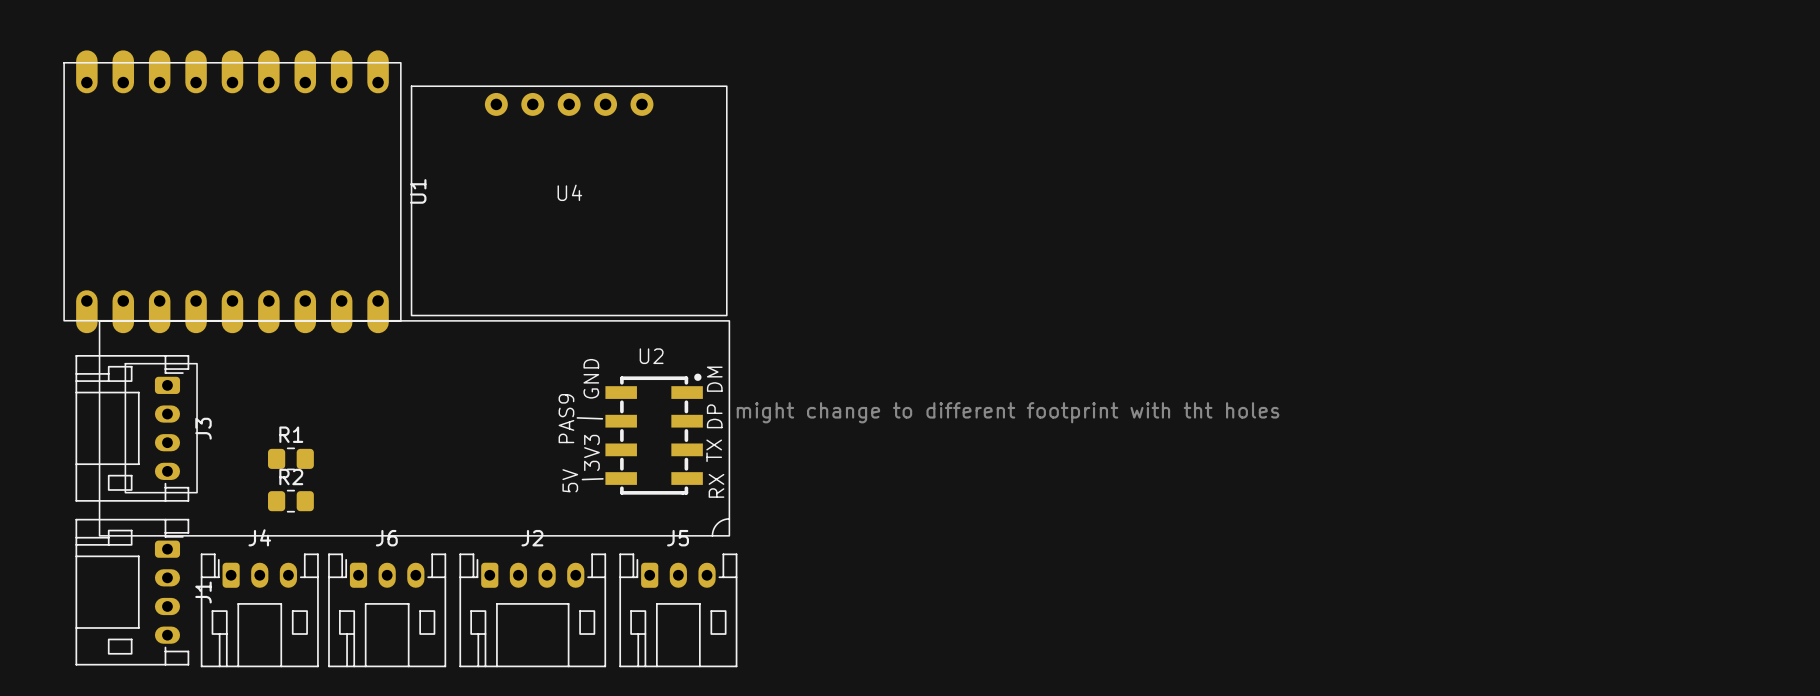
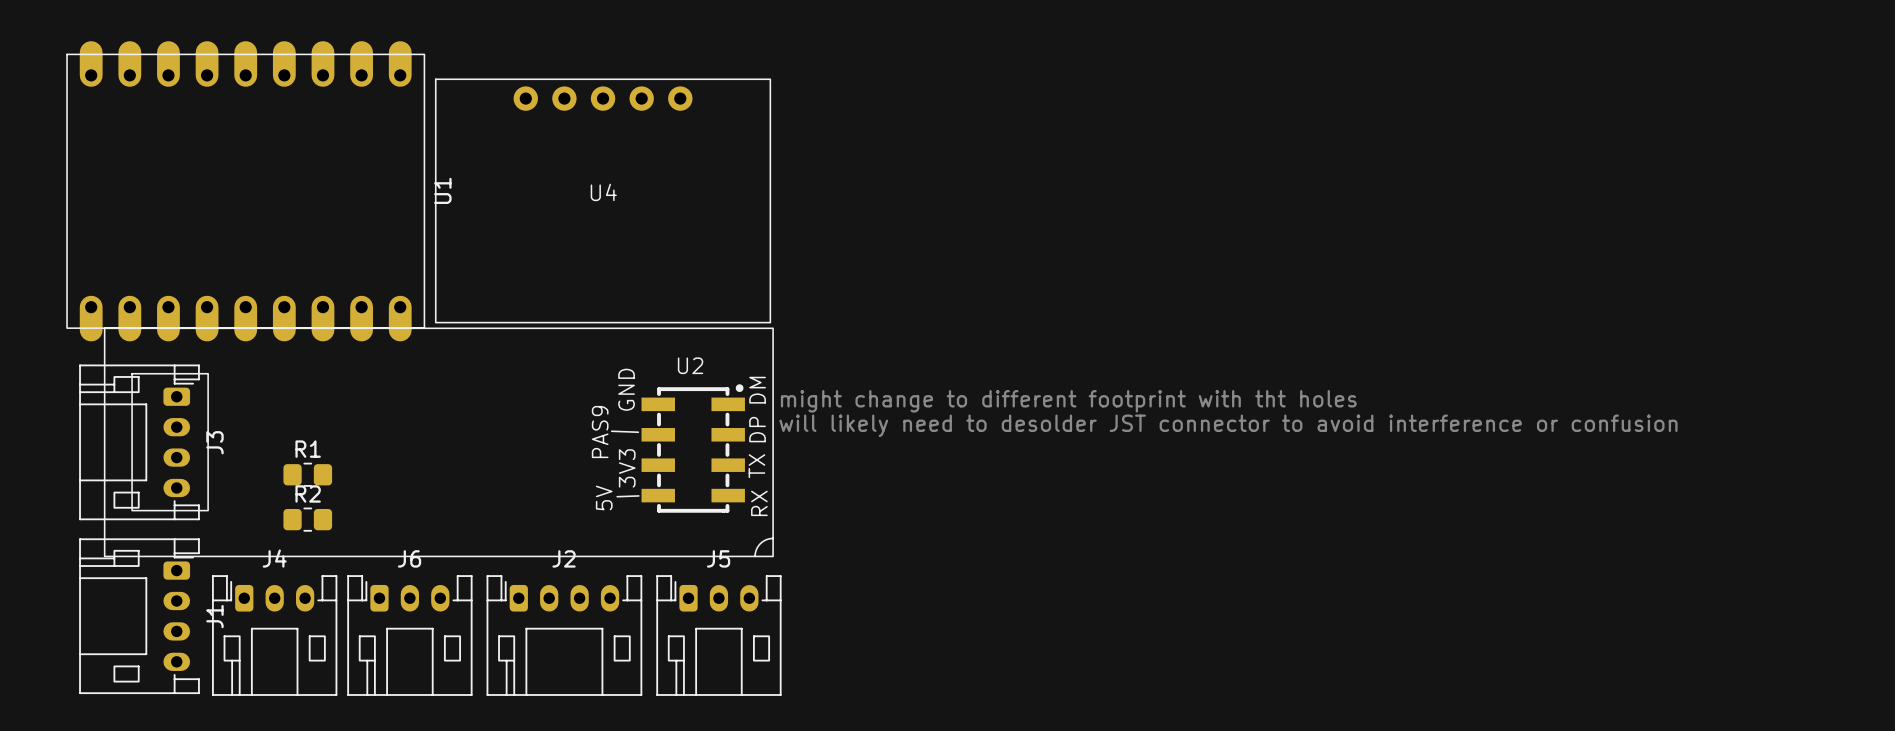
text: none -> might change to different footprint with tht holes (1068, 401)
text: might change to different footprint with tht holes (1008, 412) -> will likely need to desolder JST connector to avoid interference or confusion (1228, 425)

